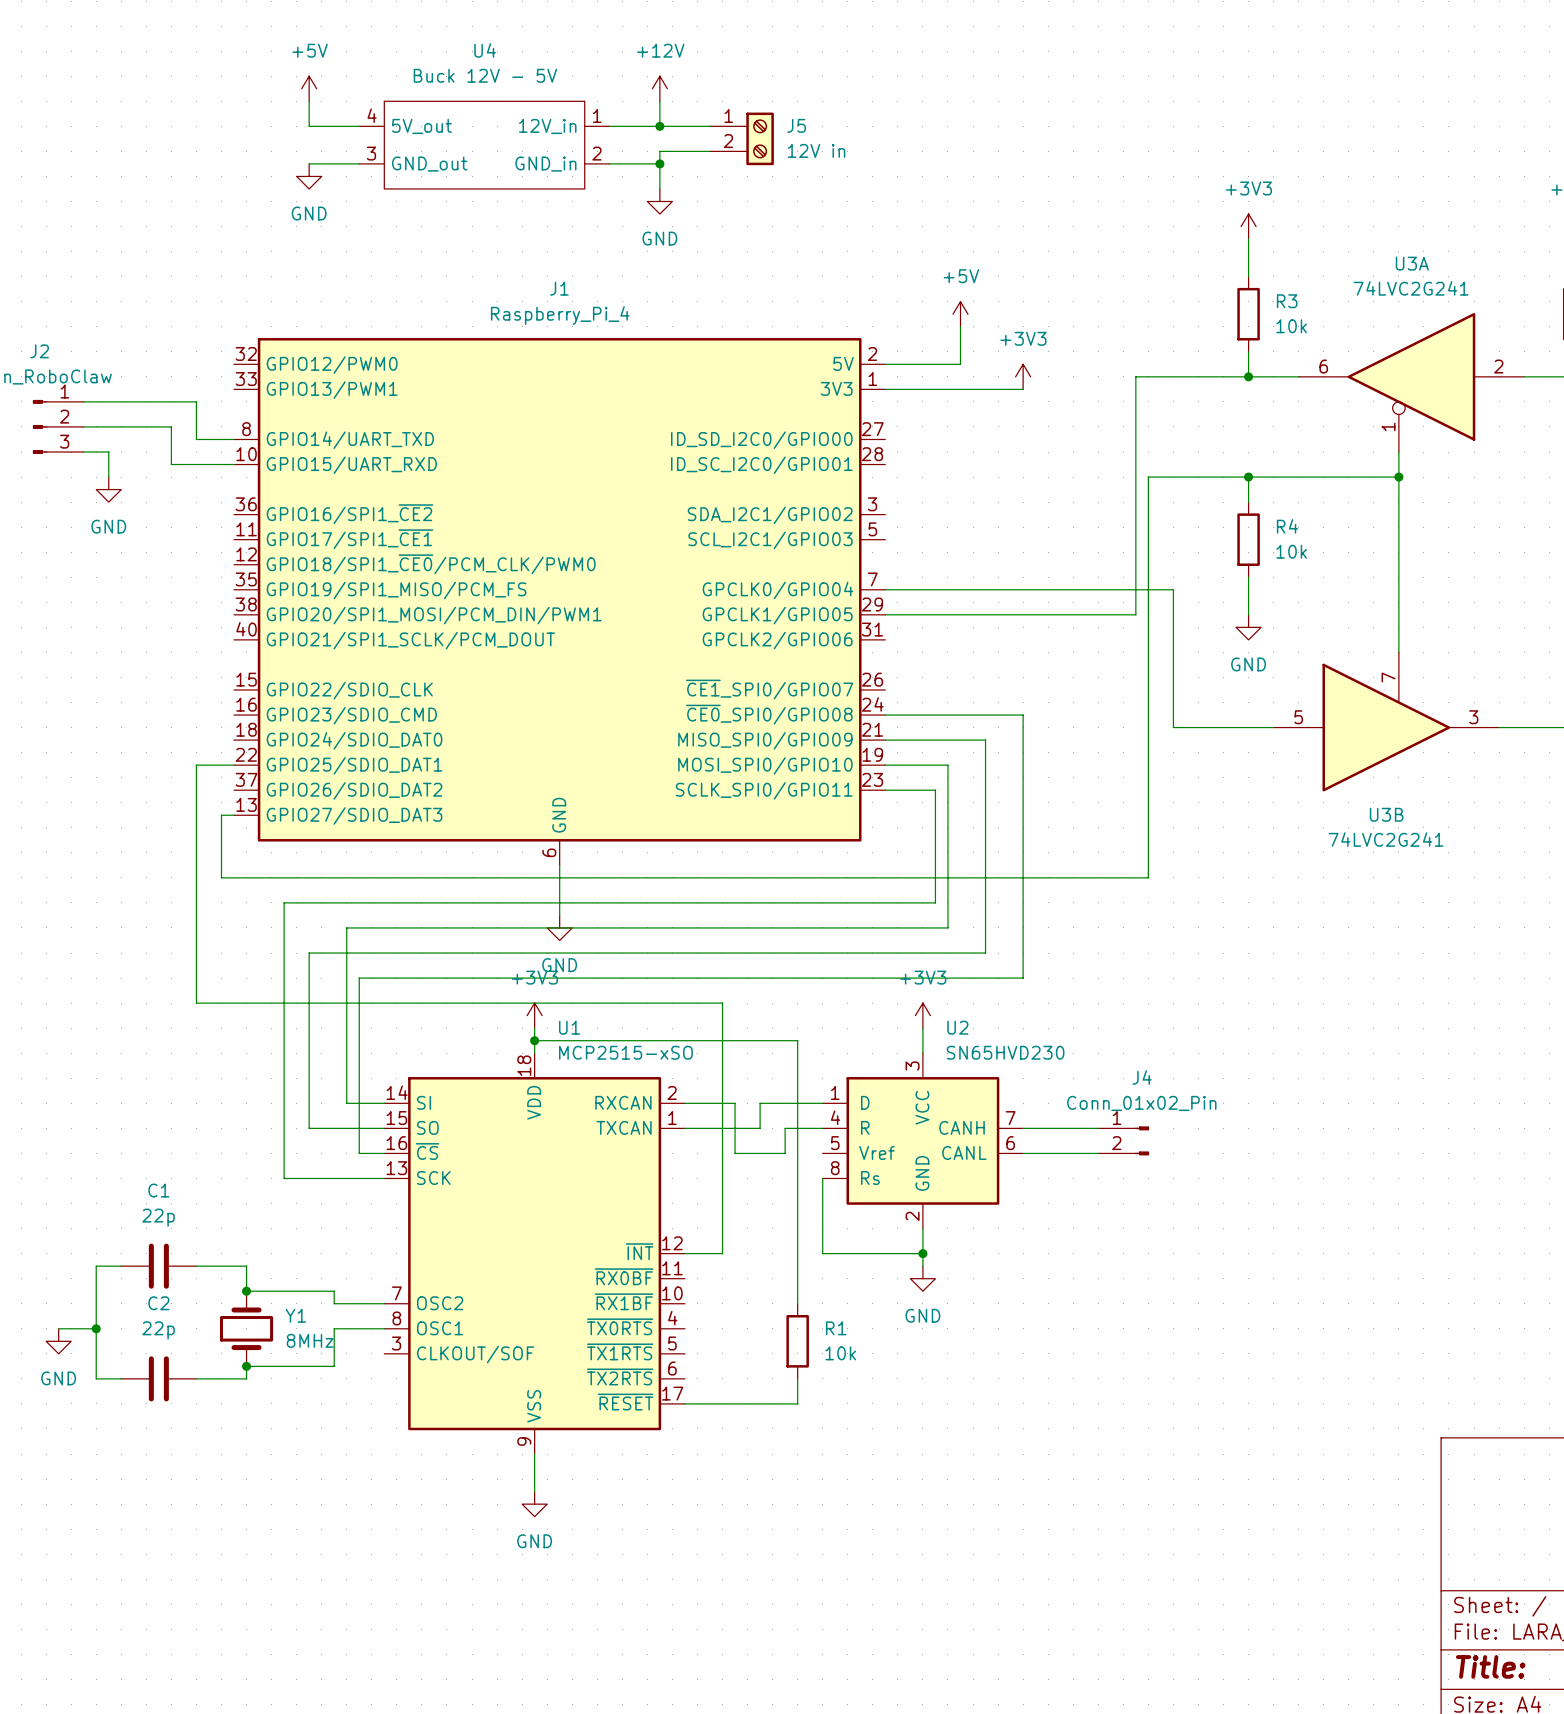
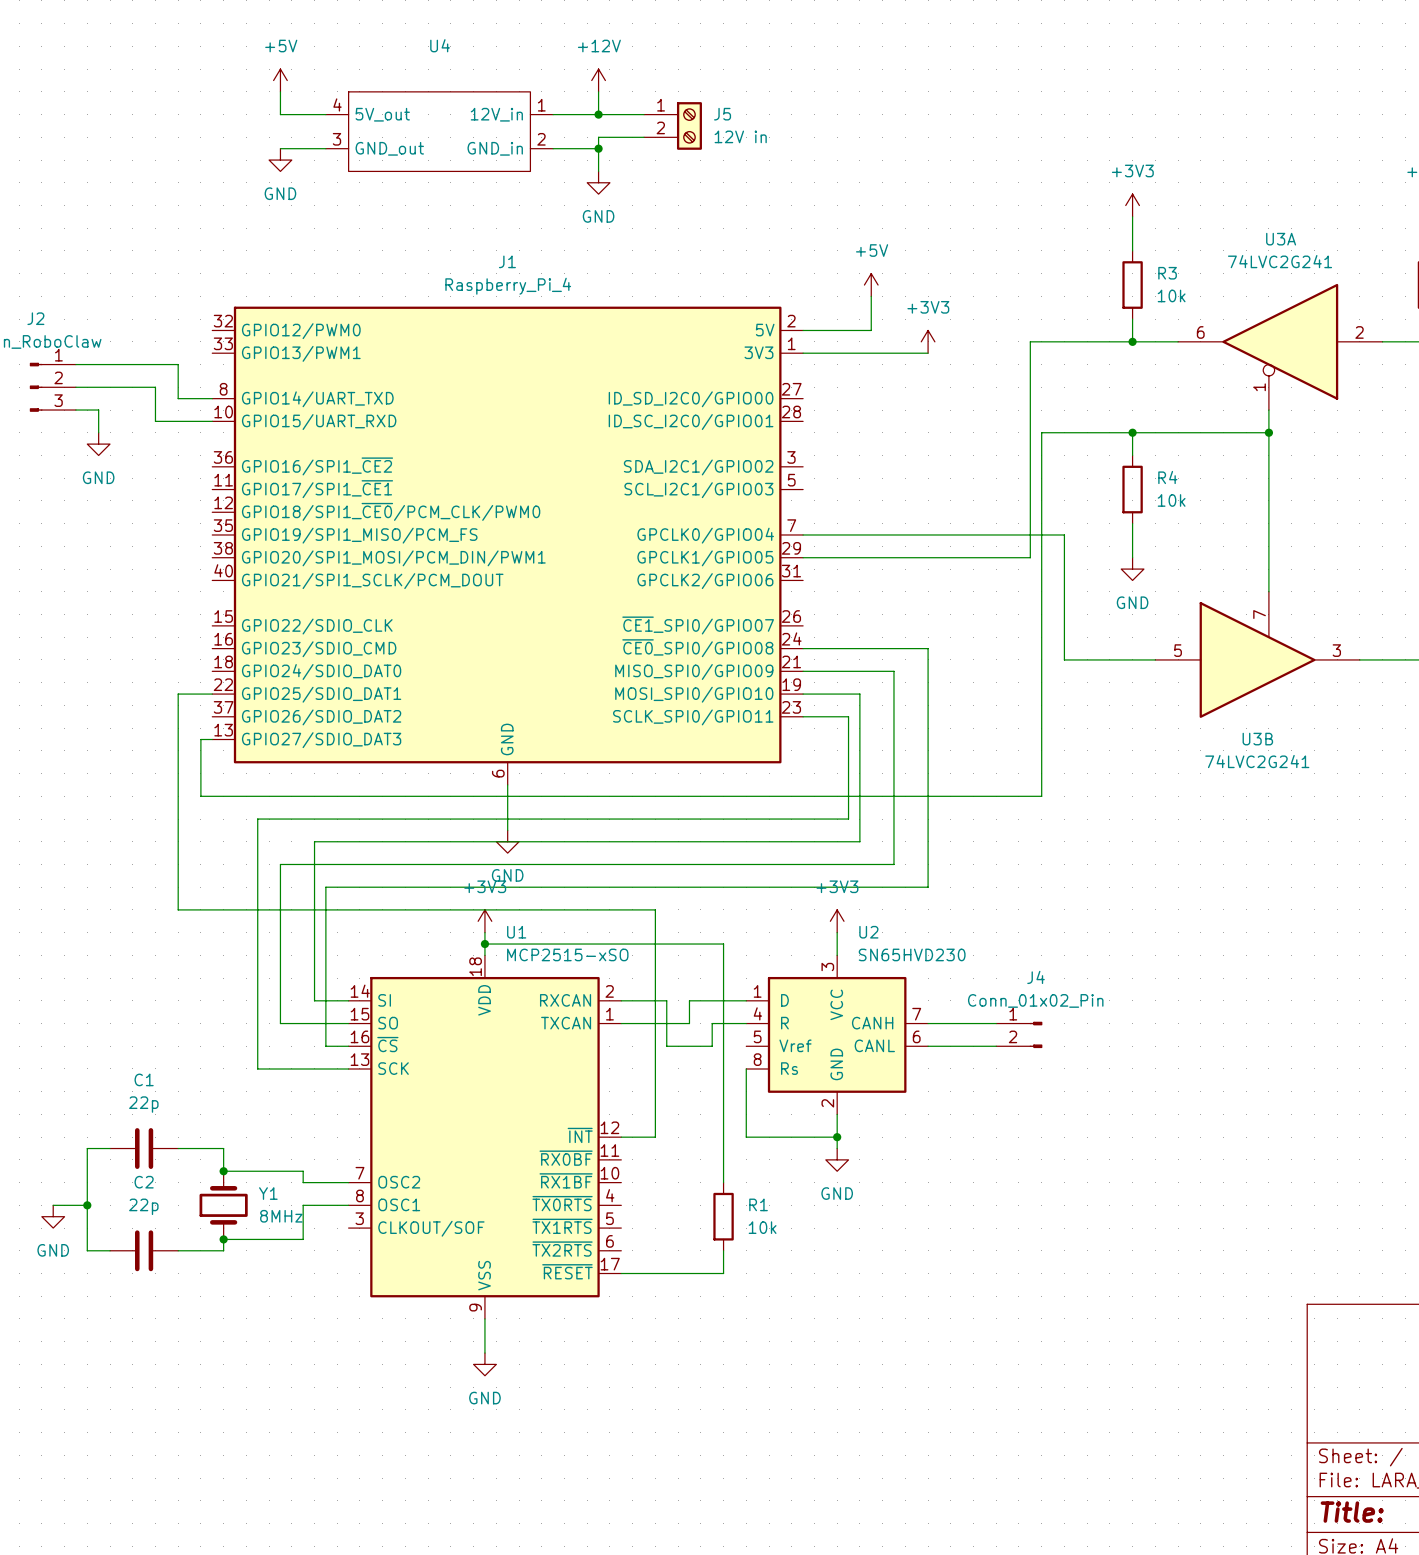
U4 value: Buck 12V - 5V (485, 75) -> none

